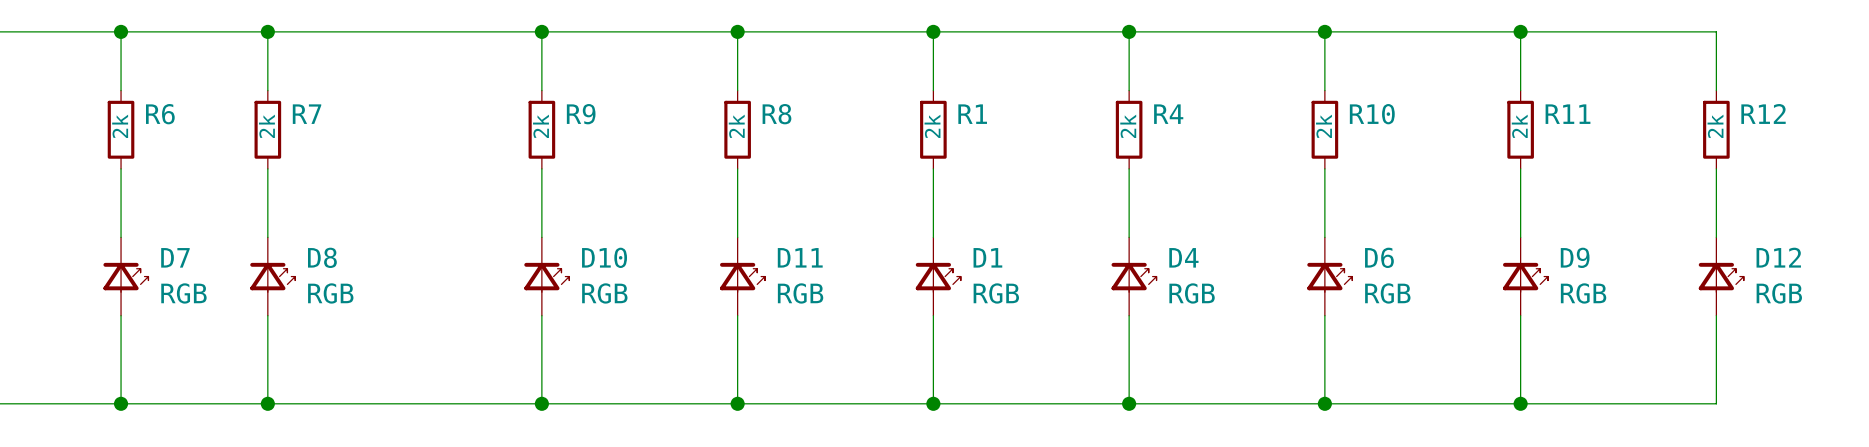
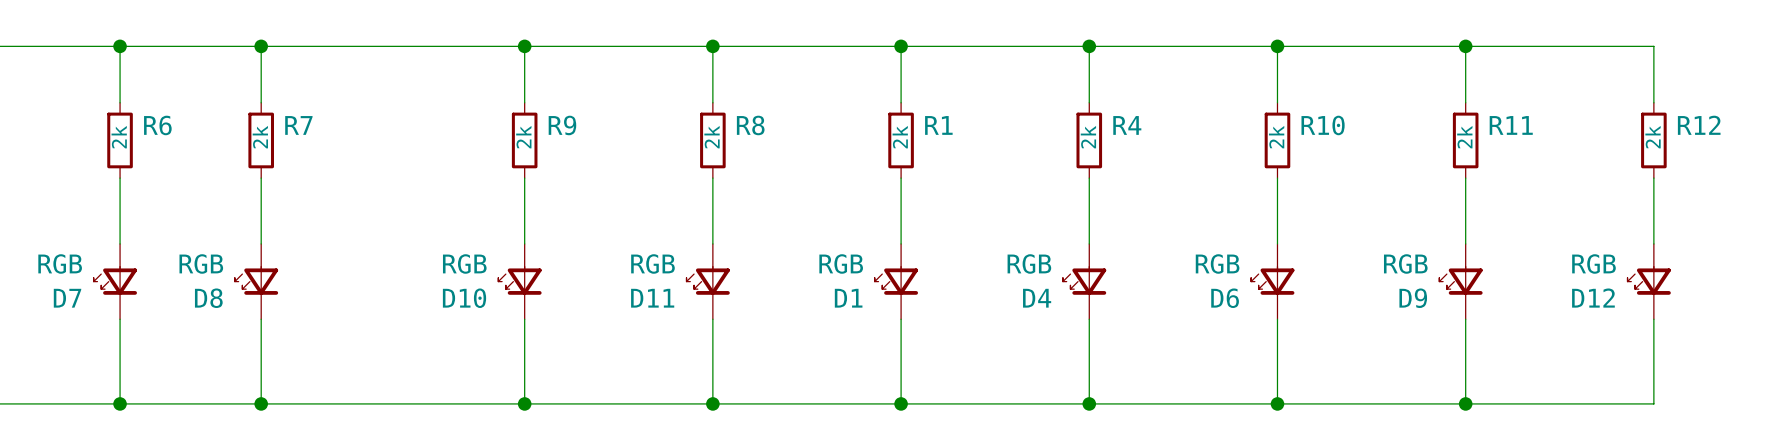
D7 rotation: 0° (125, 277) -> 180° (115, 280)
D8 rotation: 0° (272, 277) -> 180° (256, 280)
D10 rotation: 0° (546, 277) -> 180° (519, 280)
D11 rotation: 0° (742, 277) -> 180° (708, 280)
D1 rotation: 0° (938, 277) -> 180° (896, 280)
D4 rotation: 0° (1134, 277) -> 180° (1084, 280)
D6 rotation: 0° (1329, 277) -> 180° (1272, 280)
D9 rotation: 0° (1525, 277) -> 180° (1460, 280)
D12 rotation: 0° (1721, 277) -> 180° (1649, 280)

